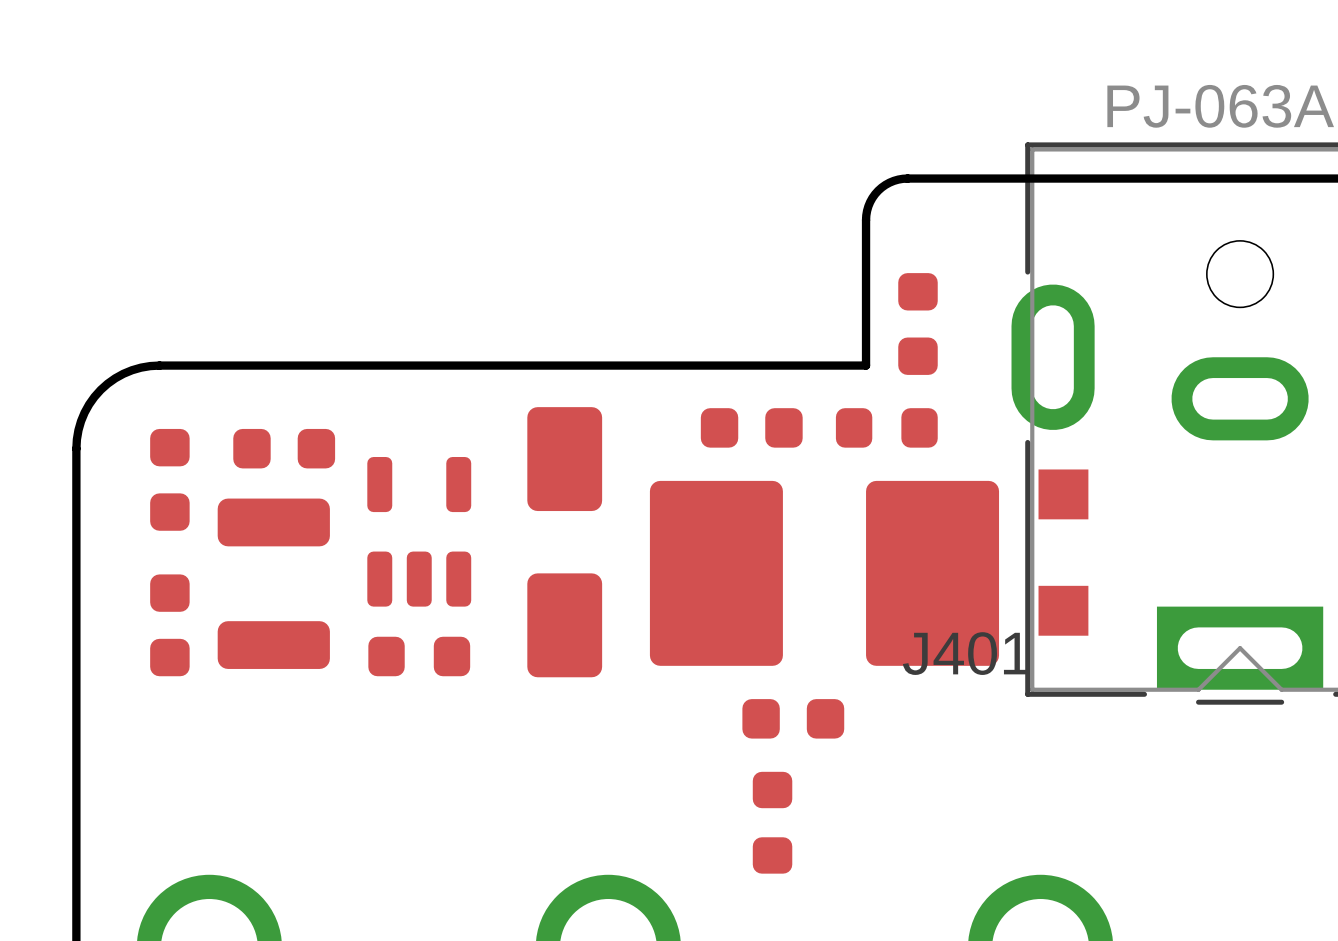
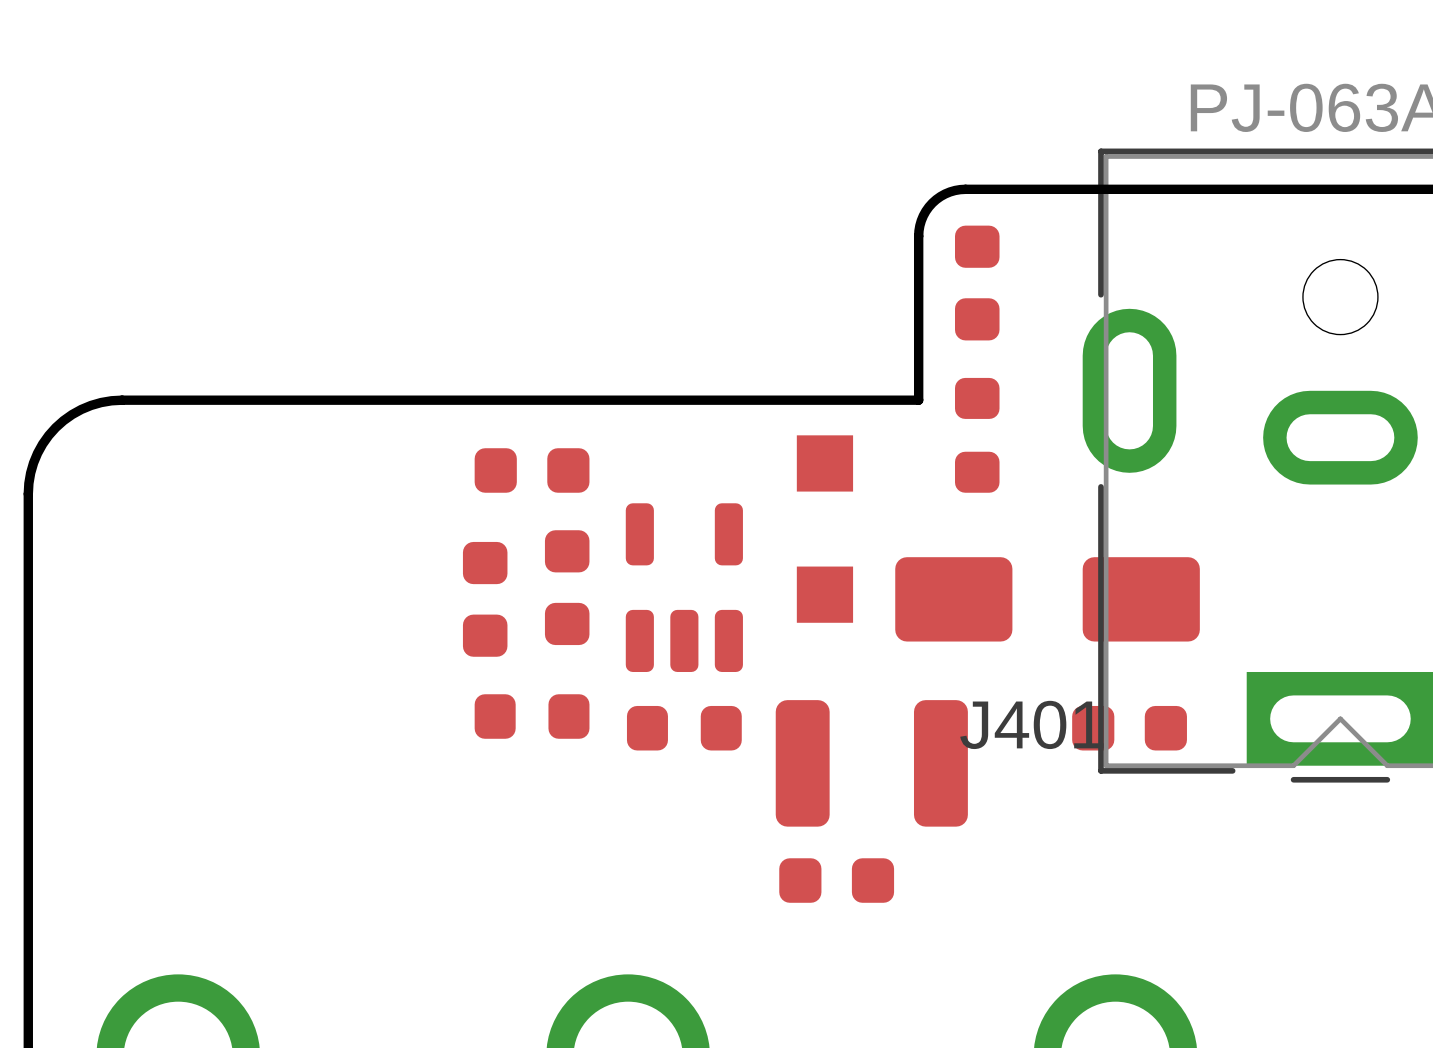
part position: (917, 324) -> (977, 283)
part footprint: [527, 407, 603, 678] -> [544, 530, 590, 646]
part: none -> (532, 470)
part: (751, 427) -> none
part rotation: 0° (886, 427) -> 90° clockwise (977, 435)
part: (284, 448) -> none
part: (169, 479) -> none
part position: (419, 531) -> (684, 587)
part: none -> (485, 599)
part: none -> (1047, 599)
part position: (1063, 552) -> (824, 529)
part: (824, 573) -> none
part rotation: 0° (273, 583) -> 90° clockwise (871, 763)
part position: (273, 583) -> (871, 763)
part: (169, 625) -> none
part position: (419, 656) -> (532, 716)
part: none -> (684, 728)
part: none -> (1129, 728)
part position: (793, 718) -> (836, 880)
part: (772, 822) -> none

